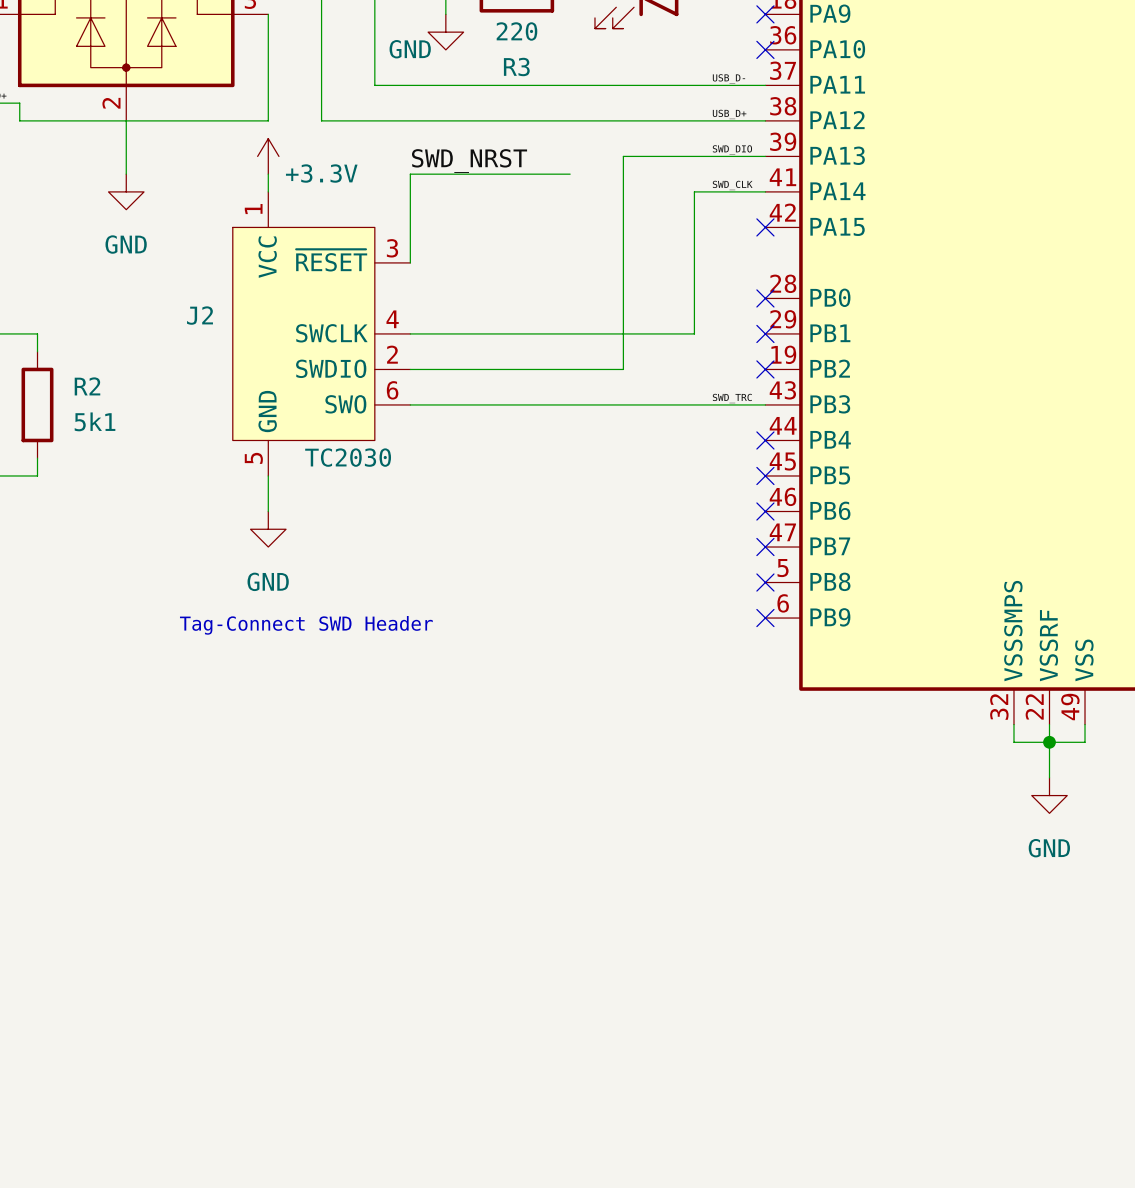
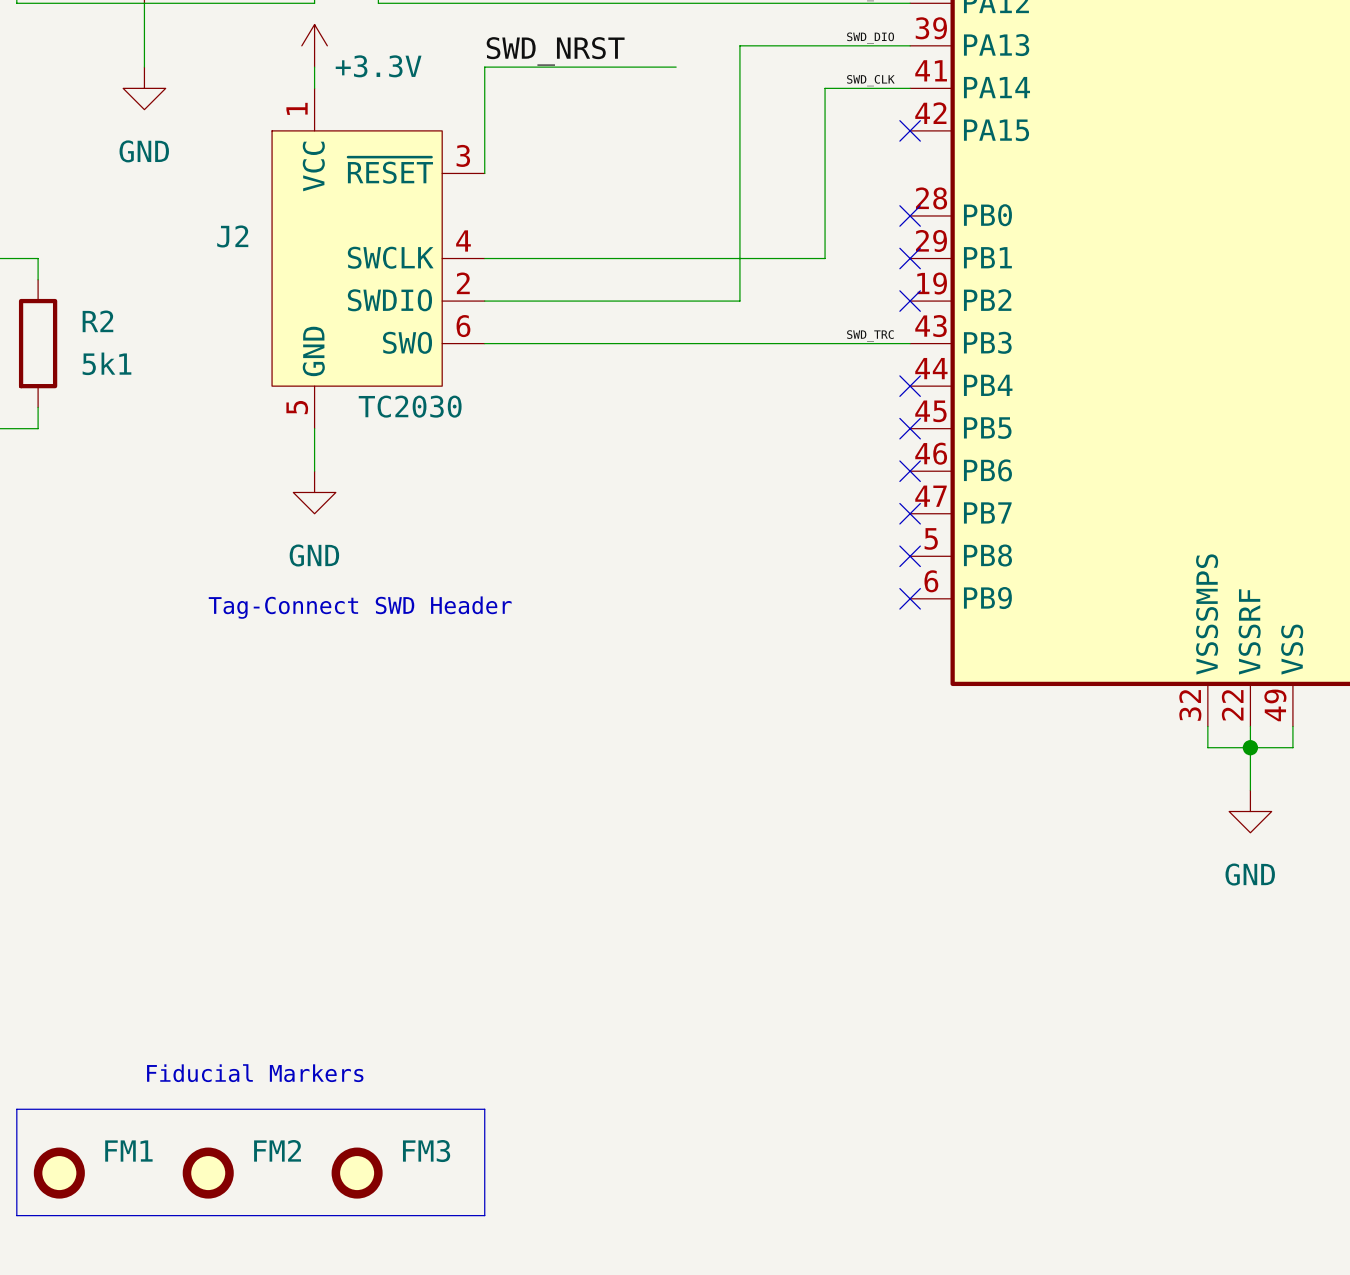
text: none -> Fiducial Markers (255, 1073)
line: none -> (16, 1109) (484, 1109) (484, 1215) (16, 1215) (16, 1109)
FM1: none -> (59, 1173)
FM2: none -> (208, 1173)
FM3: none -> (357, 1173)

